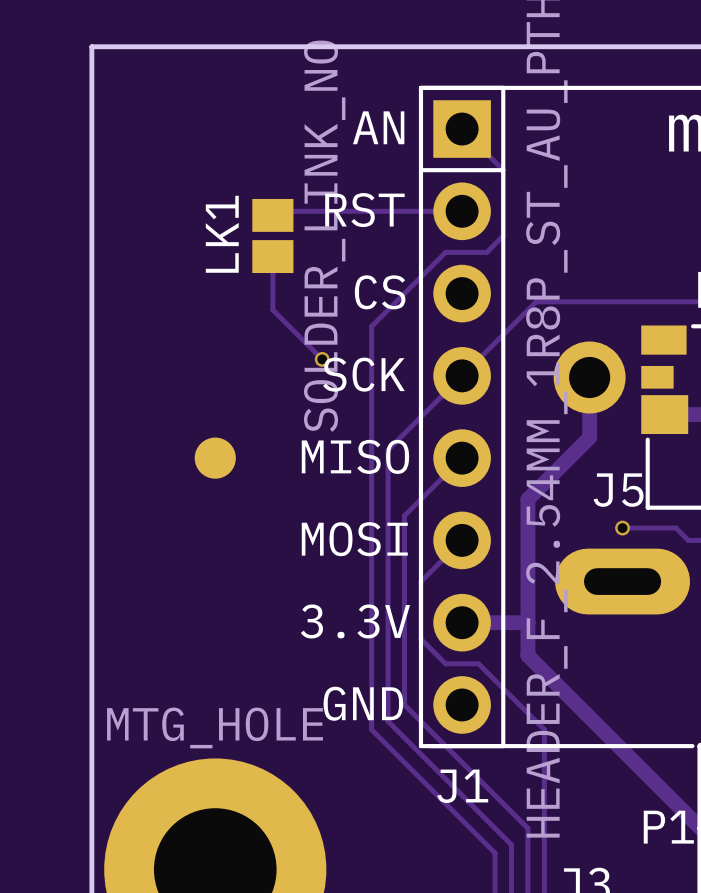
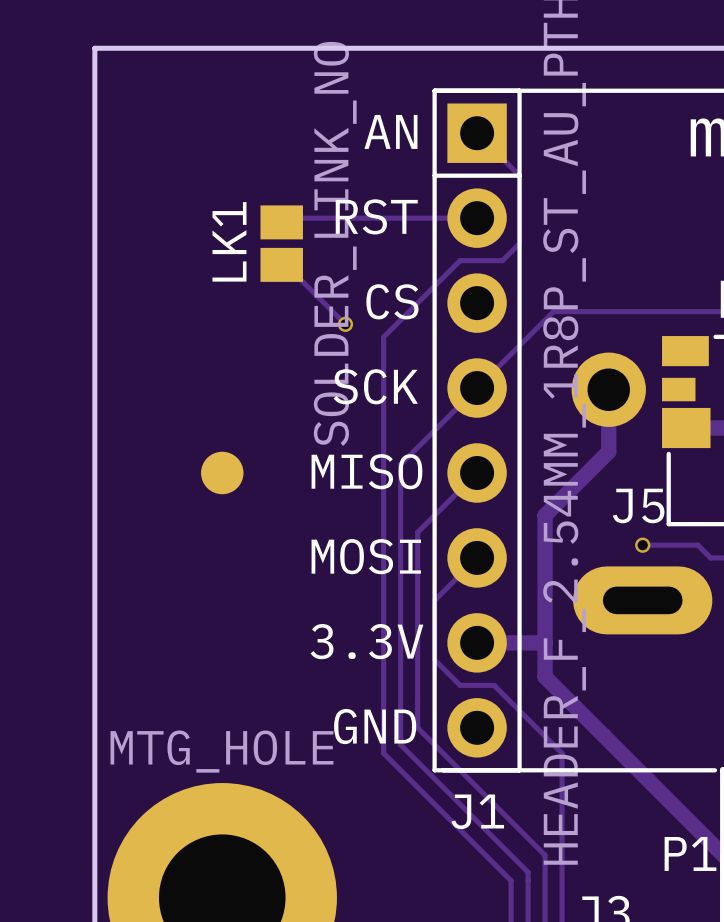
track: (272, 256) (272, 310) (322, 359) -> (281, 264) (285, 264) (345, 324)
via position: (322, 359) -> (345, 324)

